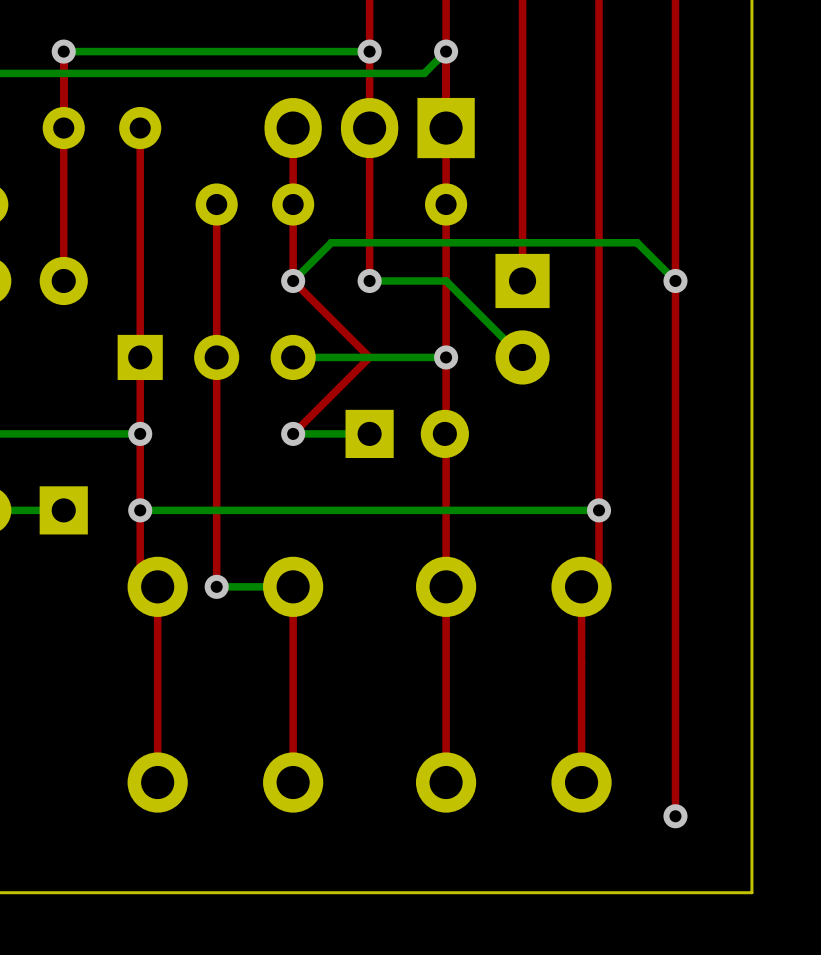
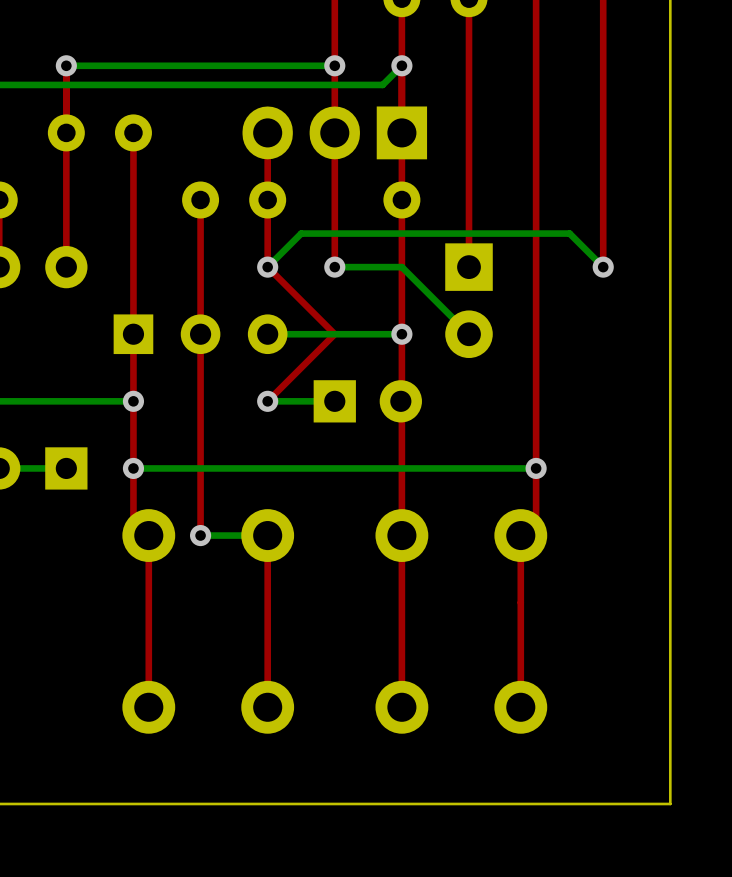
top track: (675, 280) (675, 816) -> none
via: (675, 816) -> none

